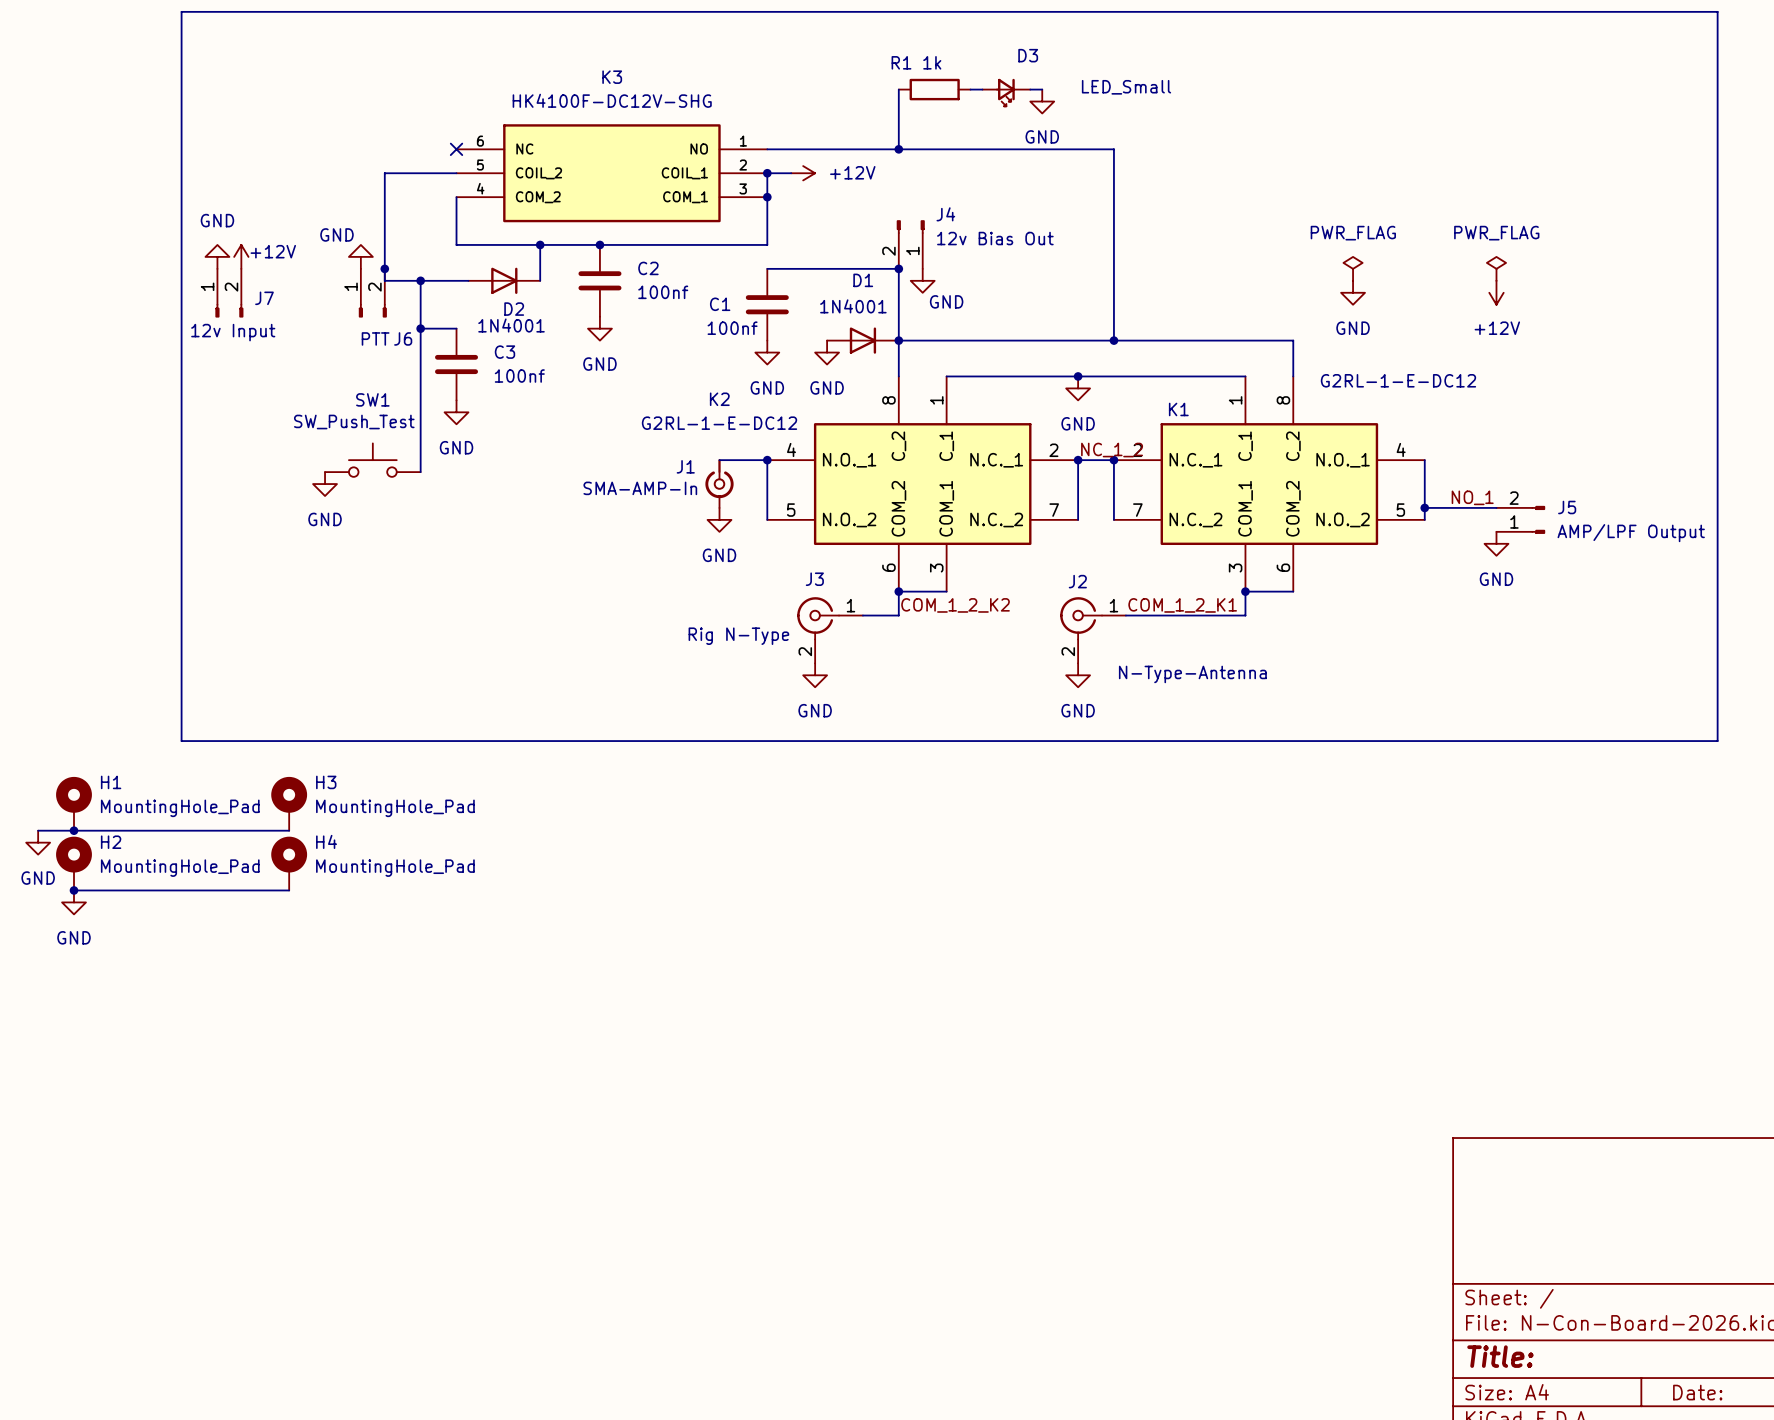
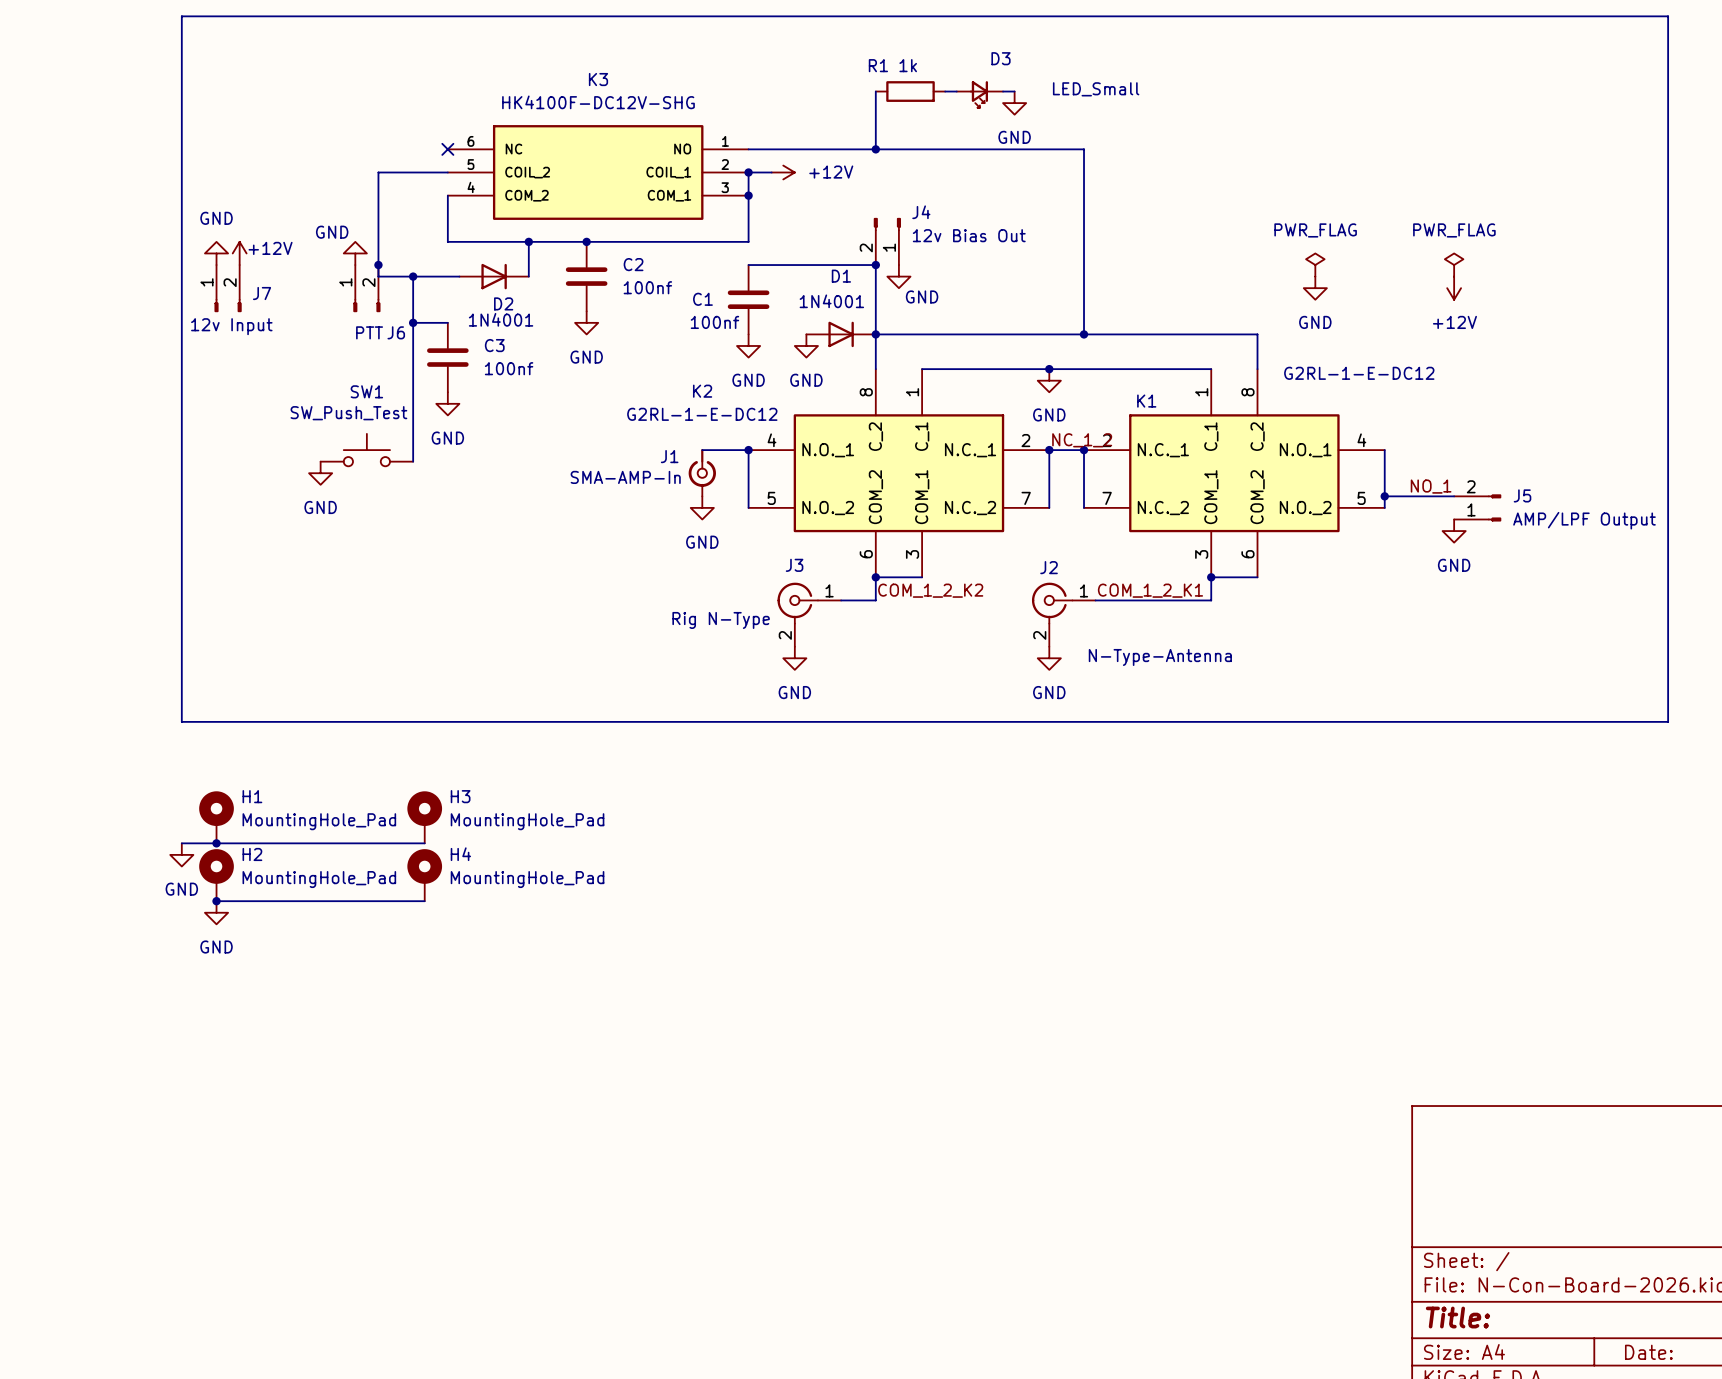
H1 position: (74, 803) -> (216, 817)
H3 position: (289, 803) -> (424, 817)
wire: (38, 830) (289, 830) -> (181, 843) (424, 843)
junction: (74, 830) -> none
power symbol: GND (38, 842) -> none
H2 position: (74, 863) -> (216, 875)
H4 position: (289, 863) -> (424, 875)
junction: none -> (216, 843)
power symbol: none -> GND (181, 854)
wire: (74, 890) (289, 890) -> (216, 901) (424, 901)
junction: (74, 890) -> none
power symbol: GND (74, 902) -> none
junction: none -> (216, 901)
power symbol: none -> GND (216, 912)

